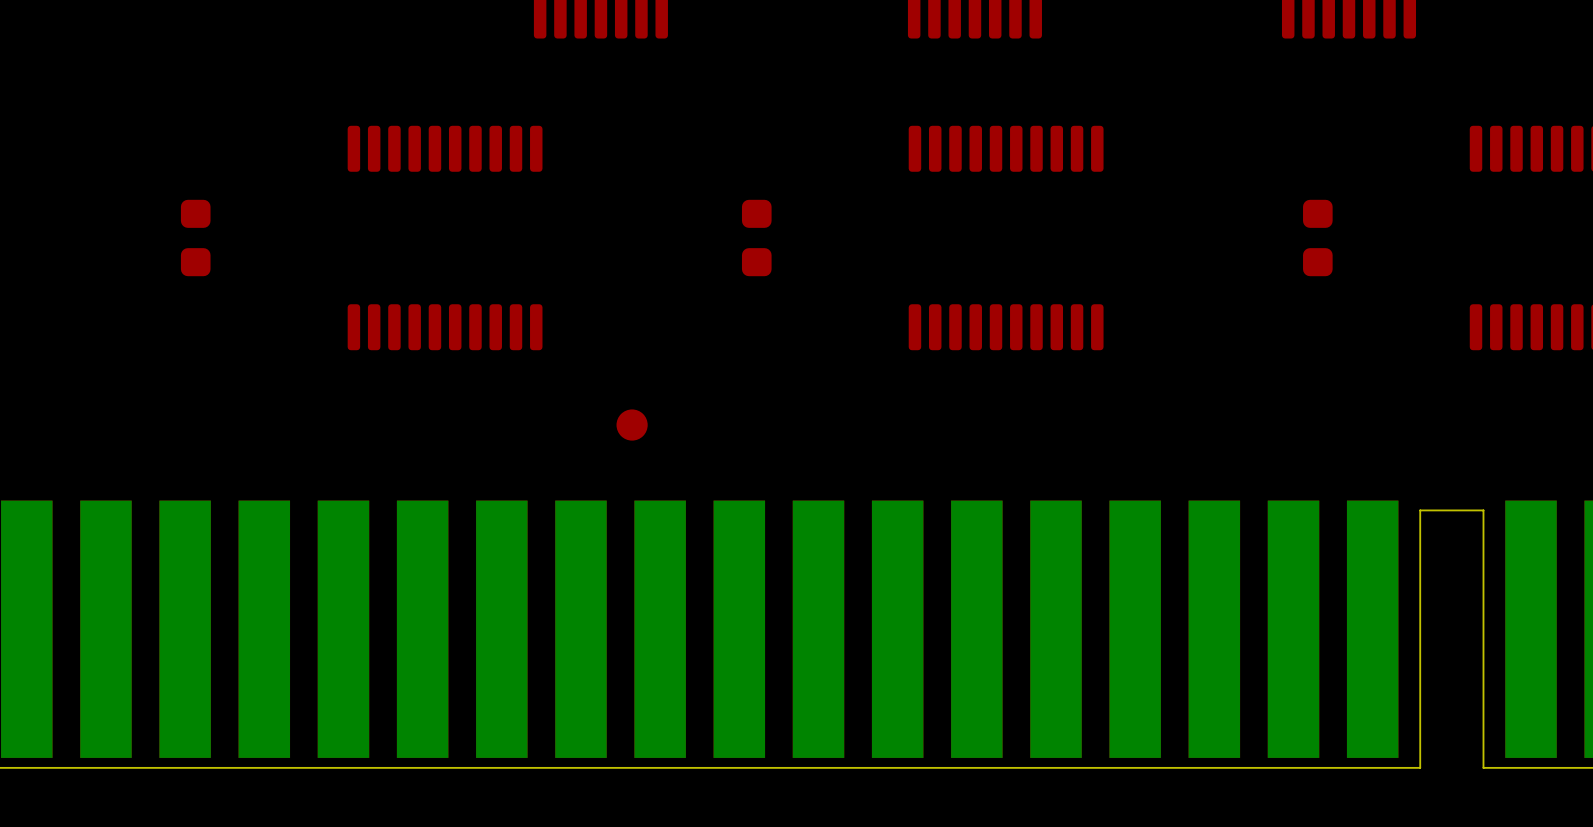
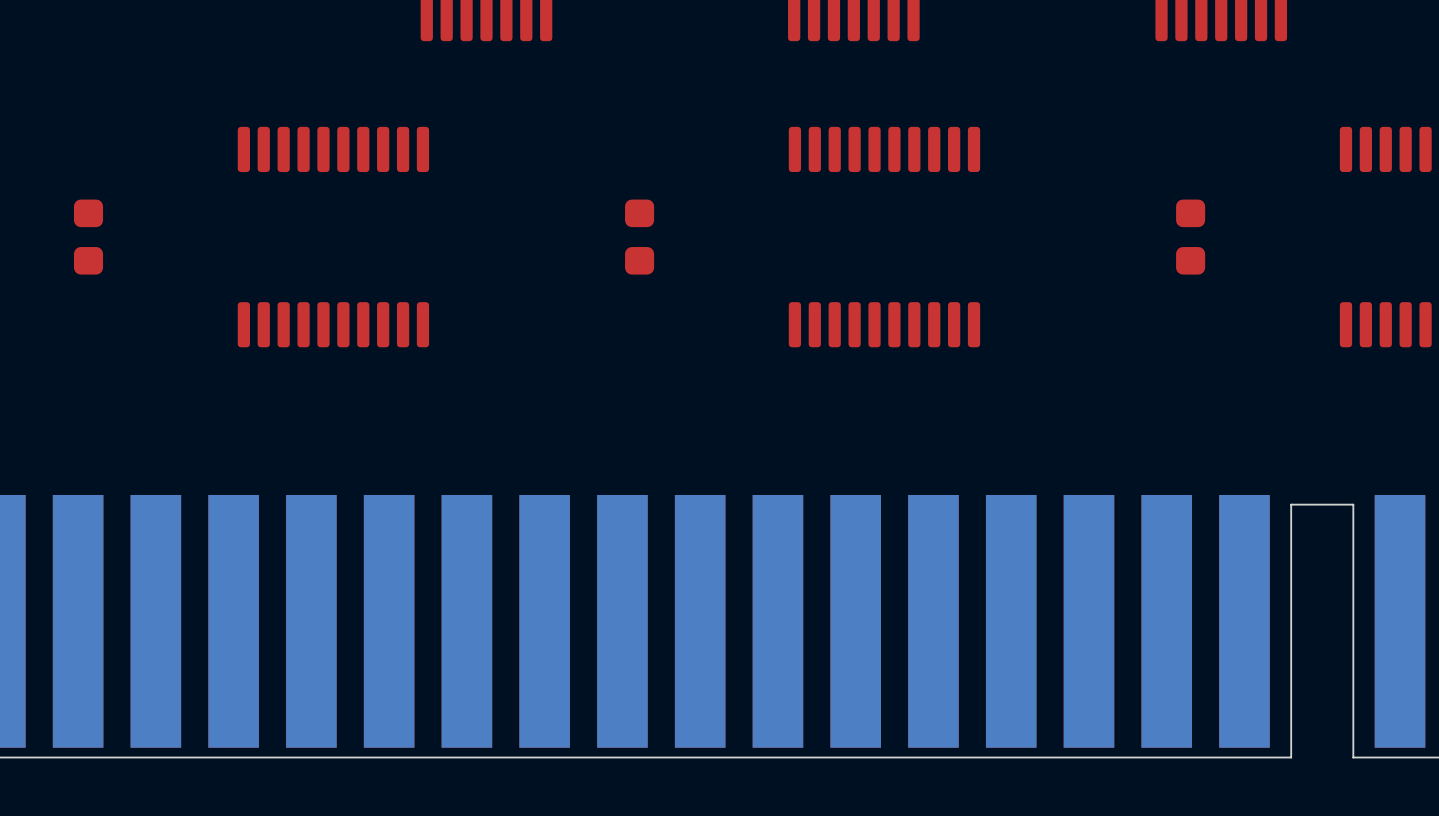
part: (632, 425) -> none

